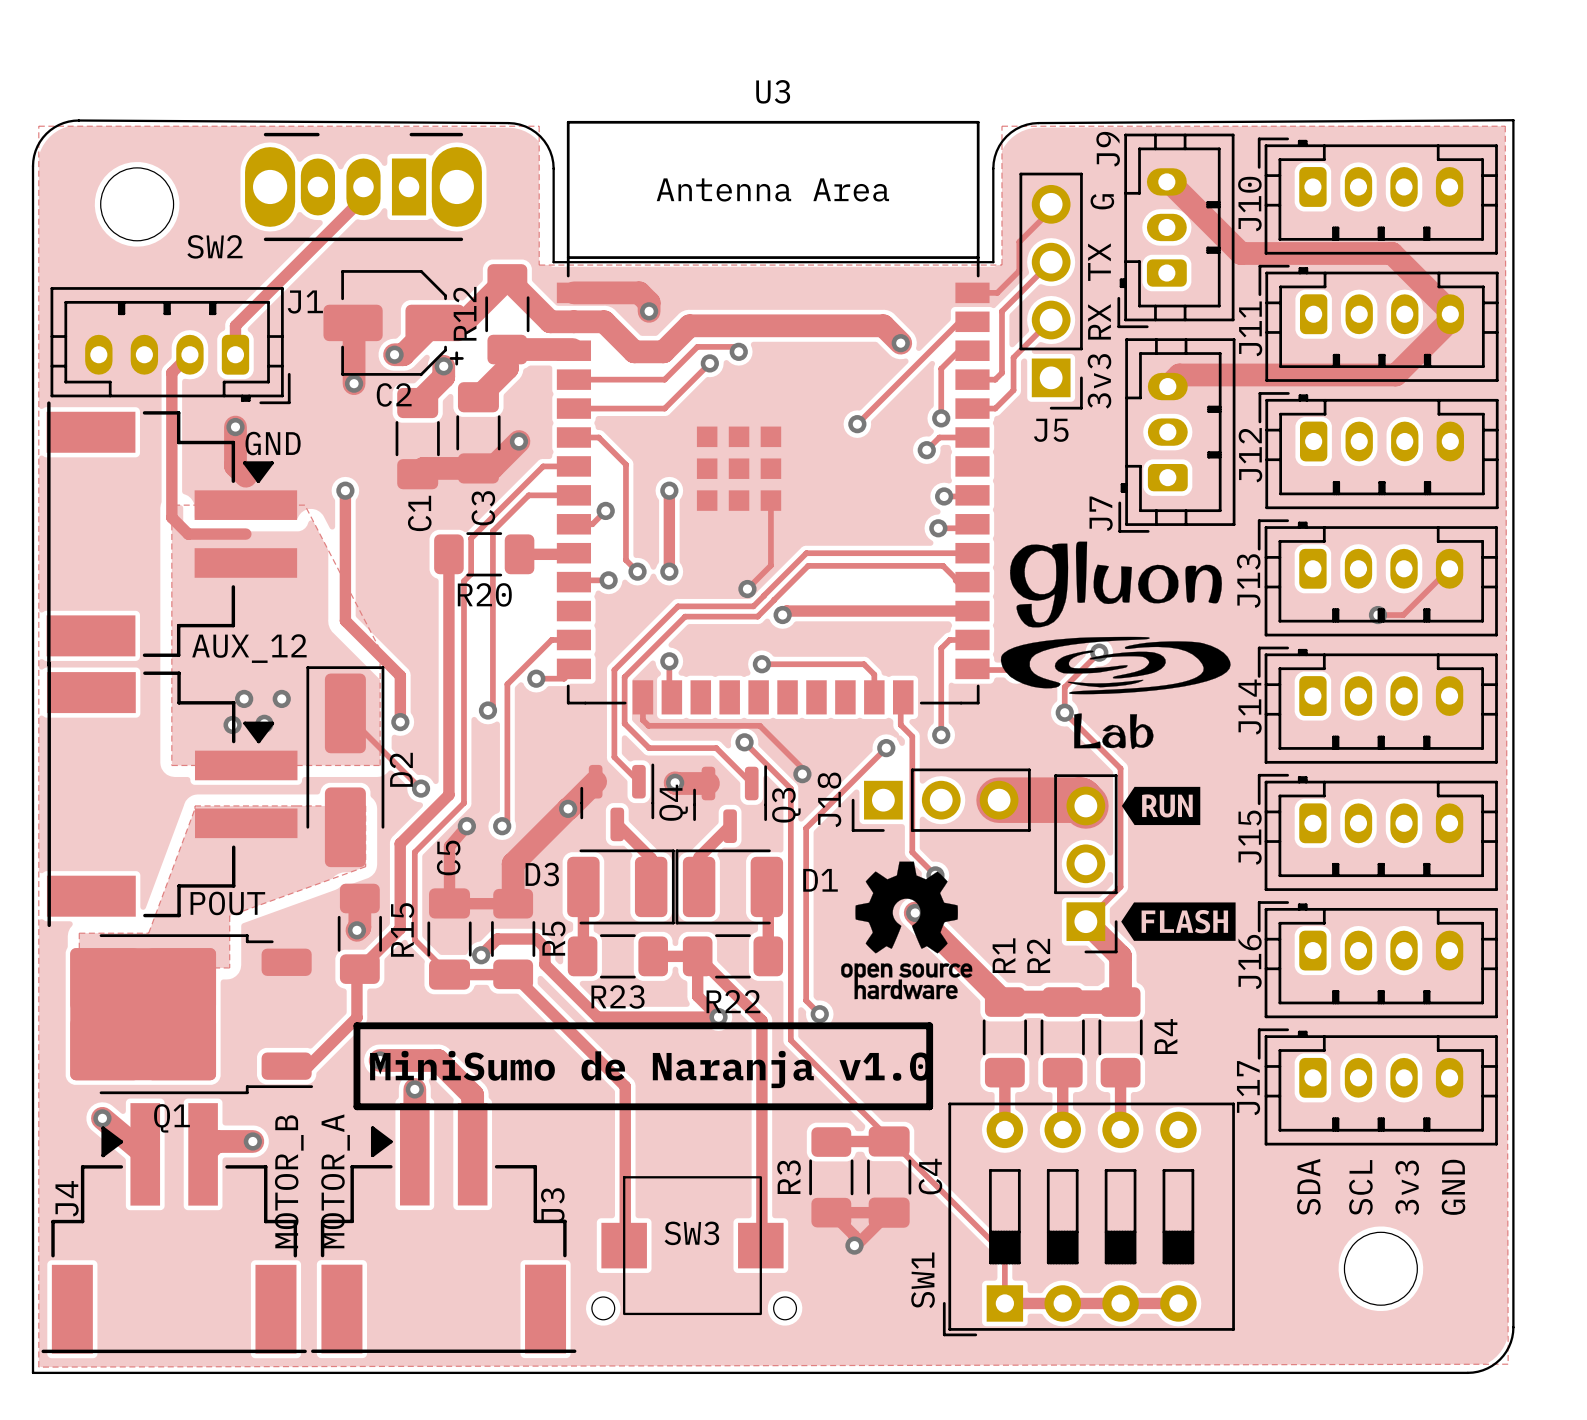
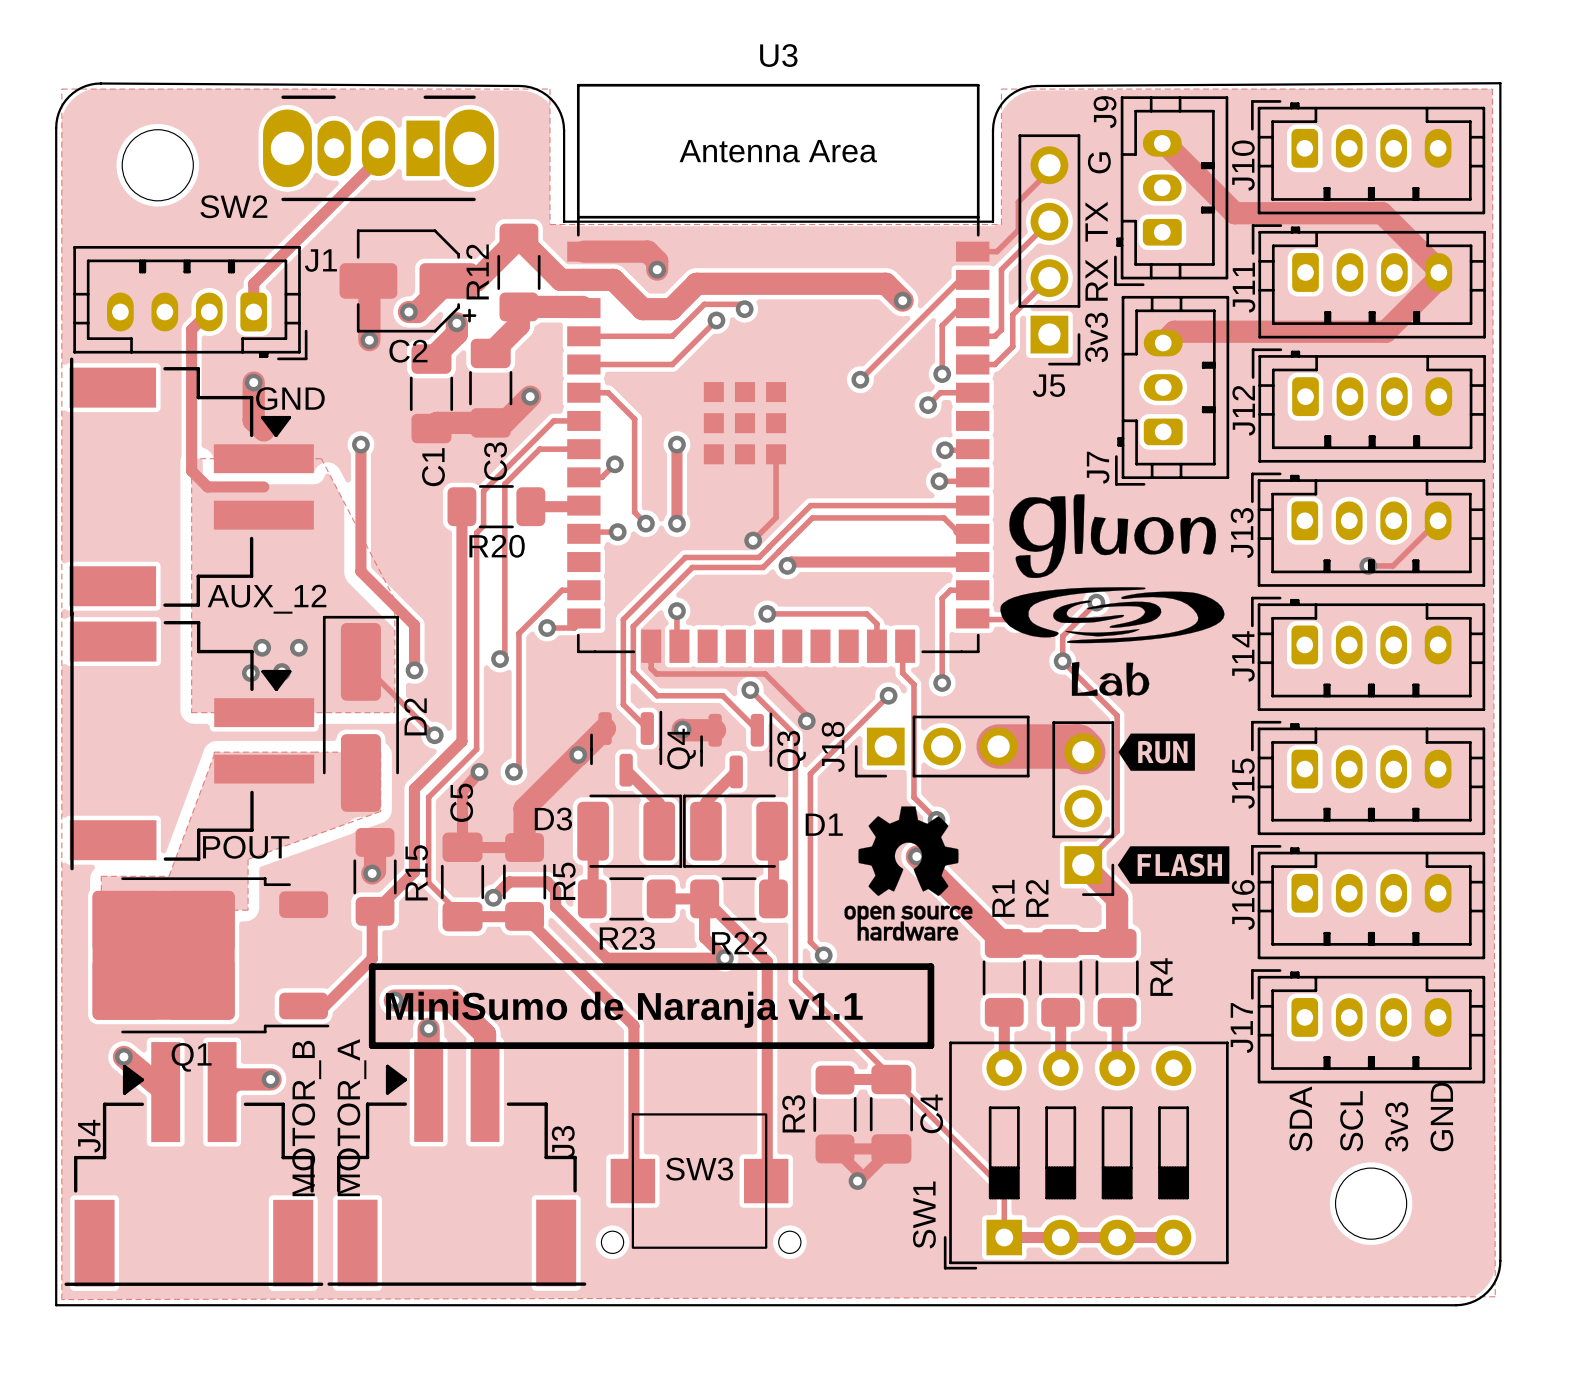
text: MiniSumo de Naranja v1.0 (650, 1069) -> MiniSumo de Naranja v1.1 (624, 1009)

